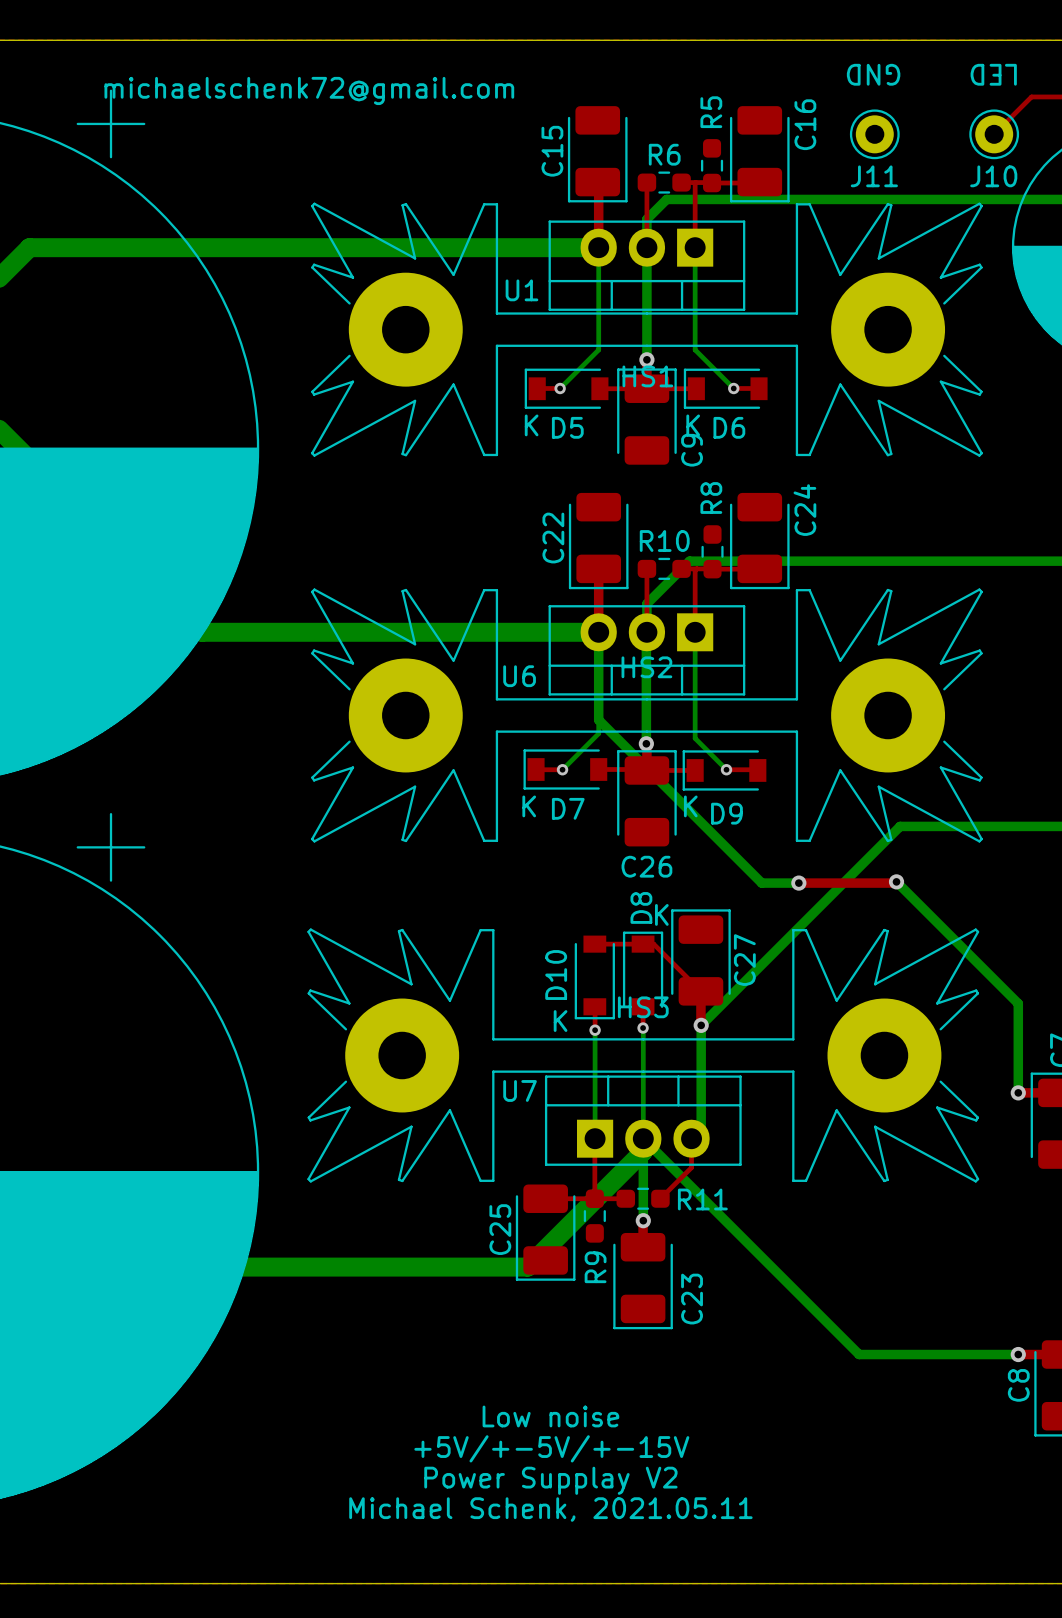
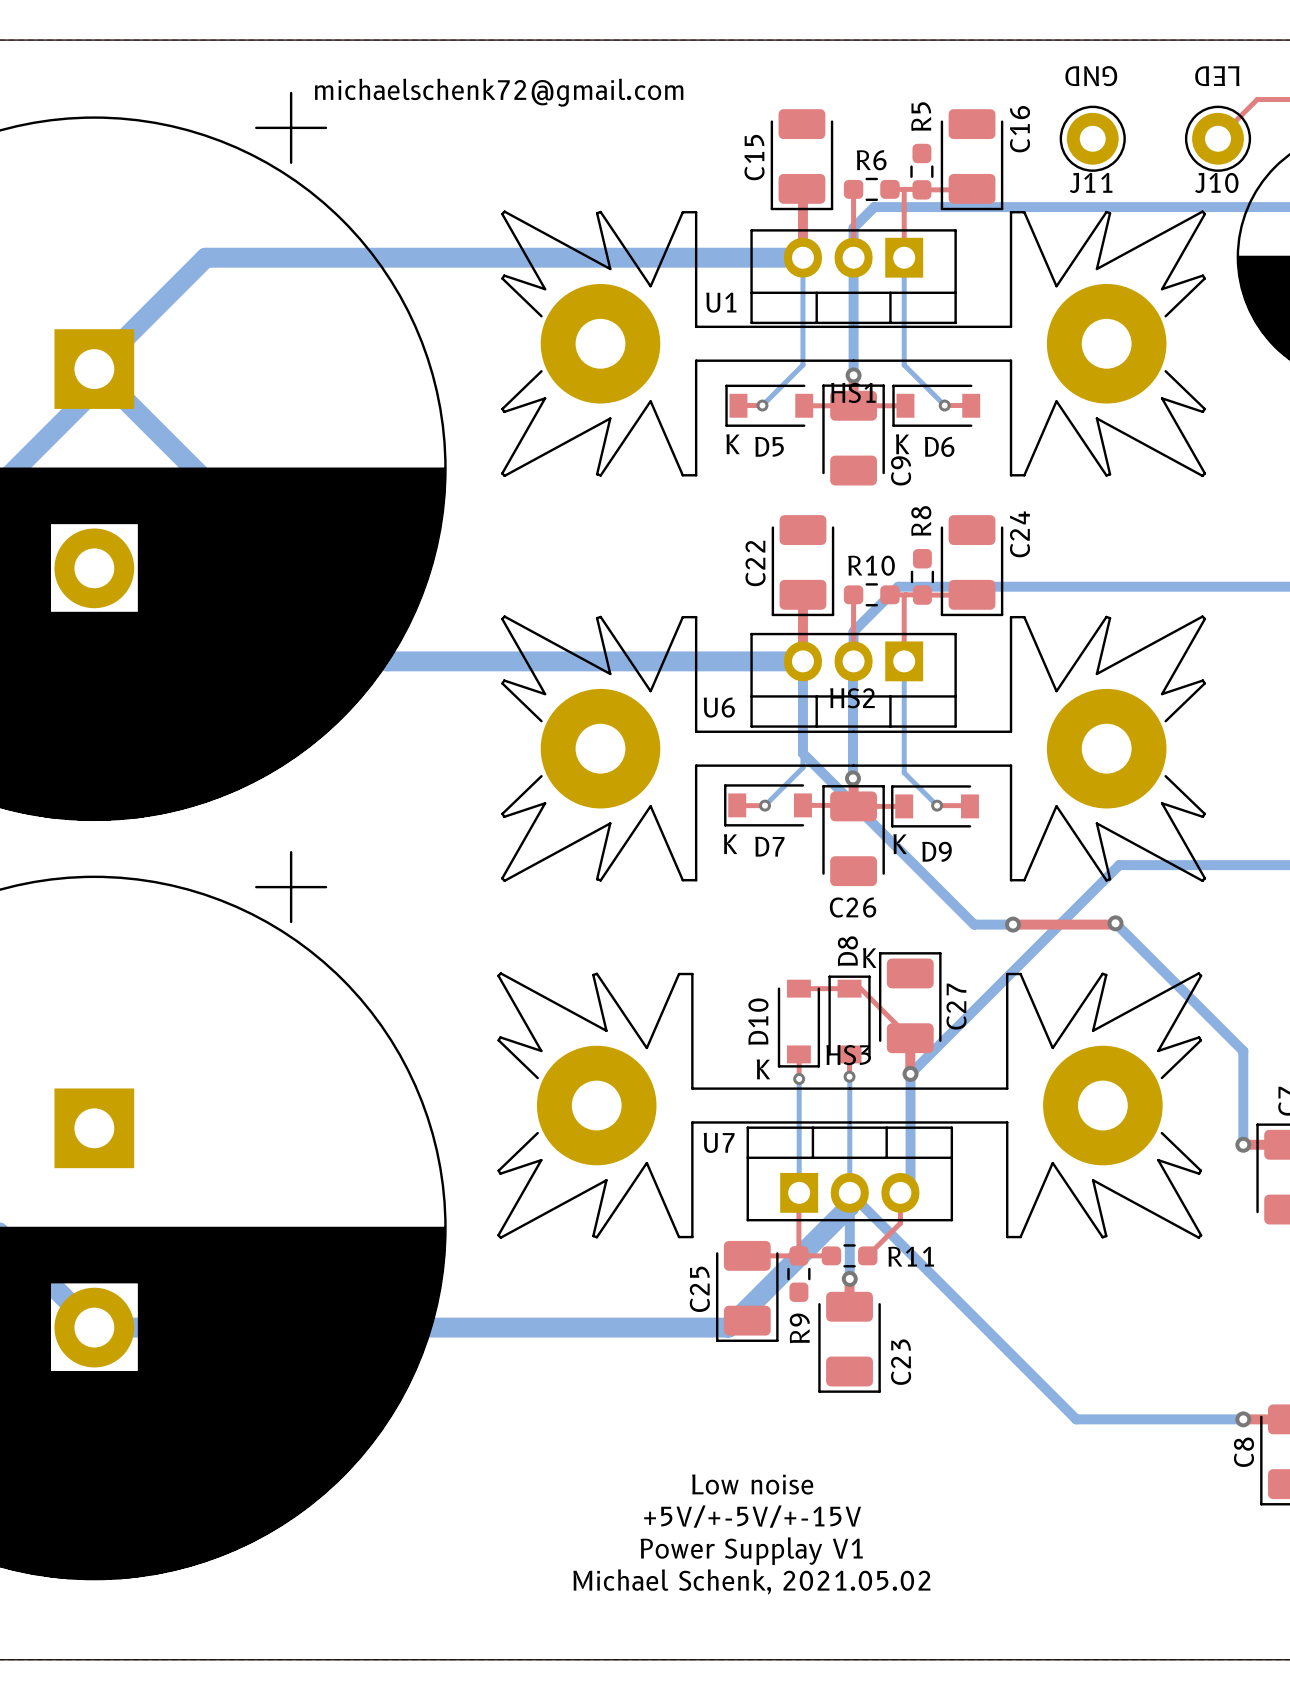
J11 footprint: [849, 109, 900, 160] -> [1059, 105, 1126, 172]
J10 footprint: [969, 109, 1020, 160] -> [1184, 105, 1252, 172]
text: Power Supplay V2 (550, 1480) -> Power Supplay V1 (751, 1551)
text: Michael Schenk, 2021.05.11 (550, 1509) -> Michael Schenk, 2021.05.02 (751, 1581)

